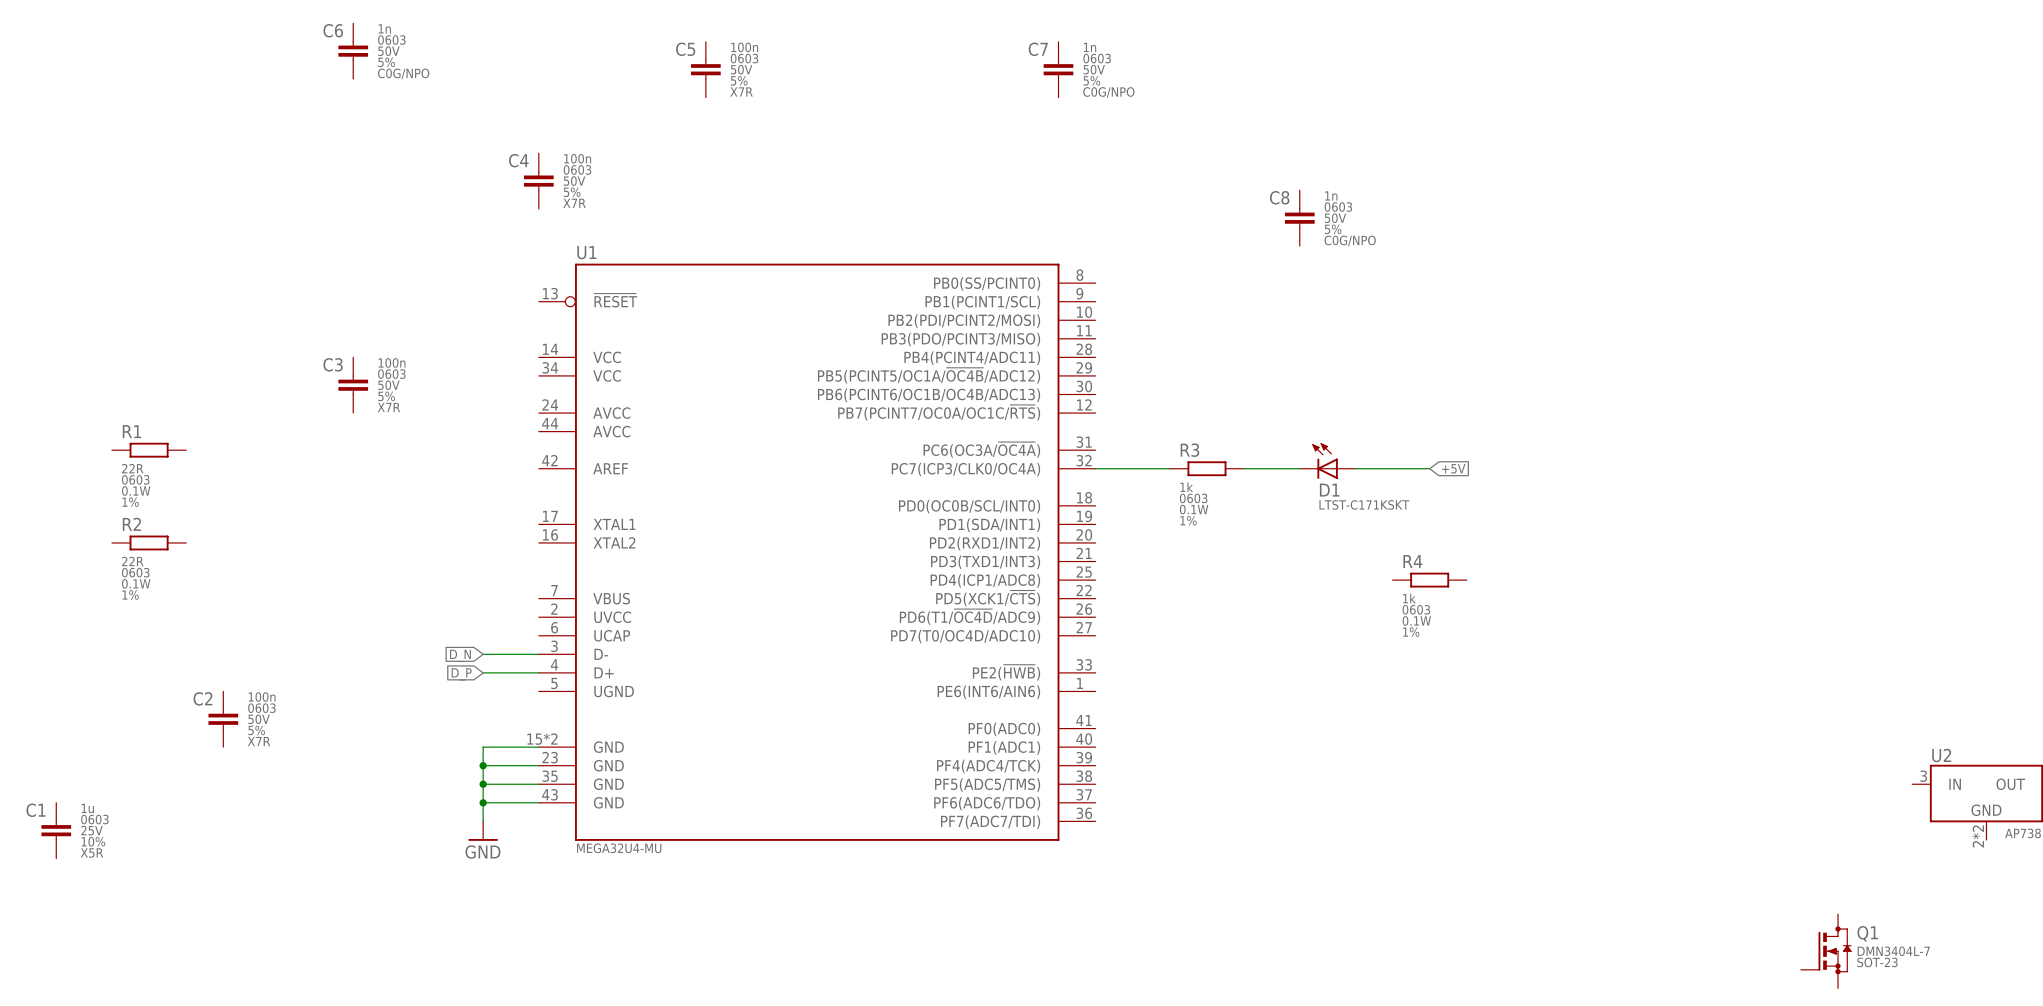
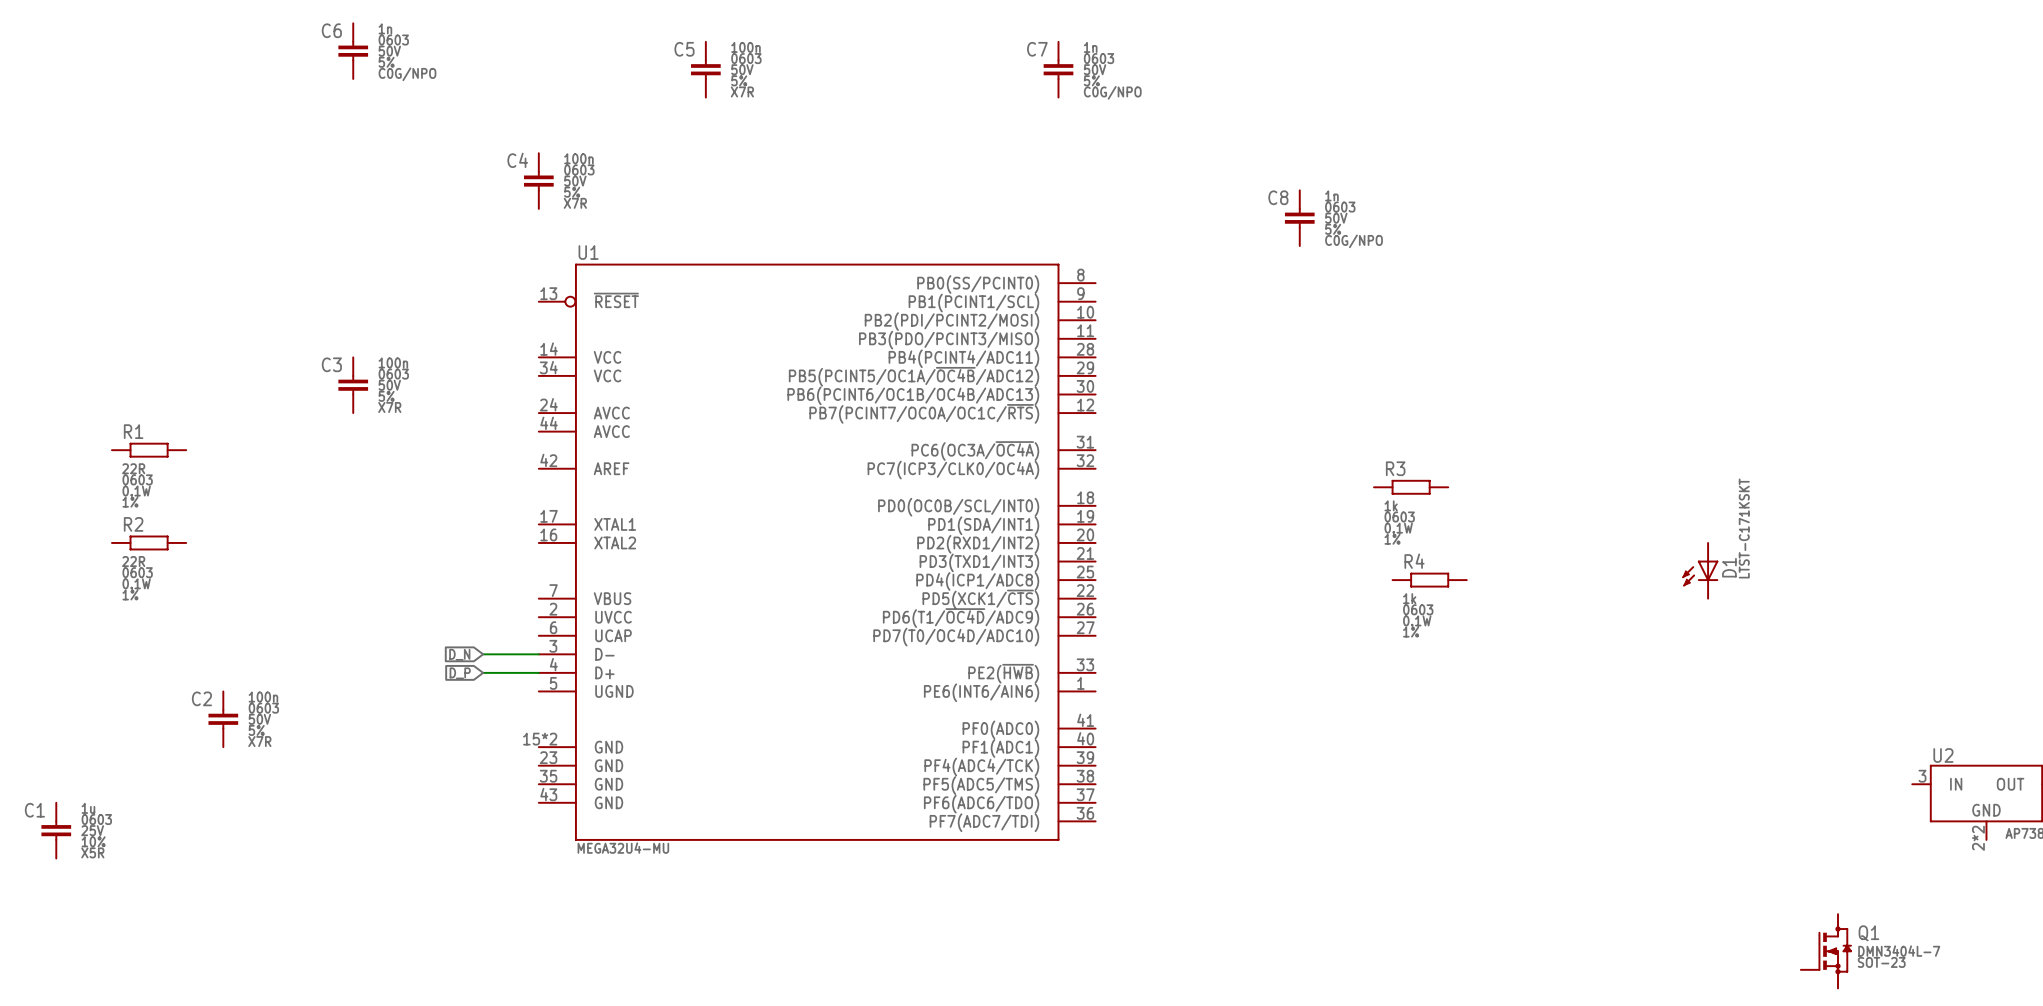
D1 rotation: 0° (1325, 461) -> 90° counterclockwise (1700, 573)
D1 position: (1327, 461) -> (1700, 570)
wire: (1095, 468) (1169, 468) -> none
R3 position: (1206, 468) -> (1411, 487)
wire: (1244, 468) (1299, 468) -> none
wire: (1355, 468) (1429, 468) -> none
global label: +5V (1453, 468) -> none
wire: (538, 747) (483, 747) (483, 821) -> none
wire: (483, 765) (538, 765) -> none
junction: (483, 765) -> none
wire: (483, 784) (538, 784) -> none
junction: (483, 784) -> none
wire: (483, 802) (538, 802) -> none
junction: (483, 802) -> none
power symbol: GND (483, 831) -> none

